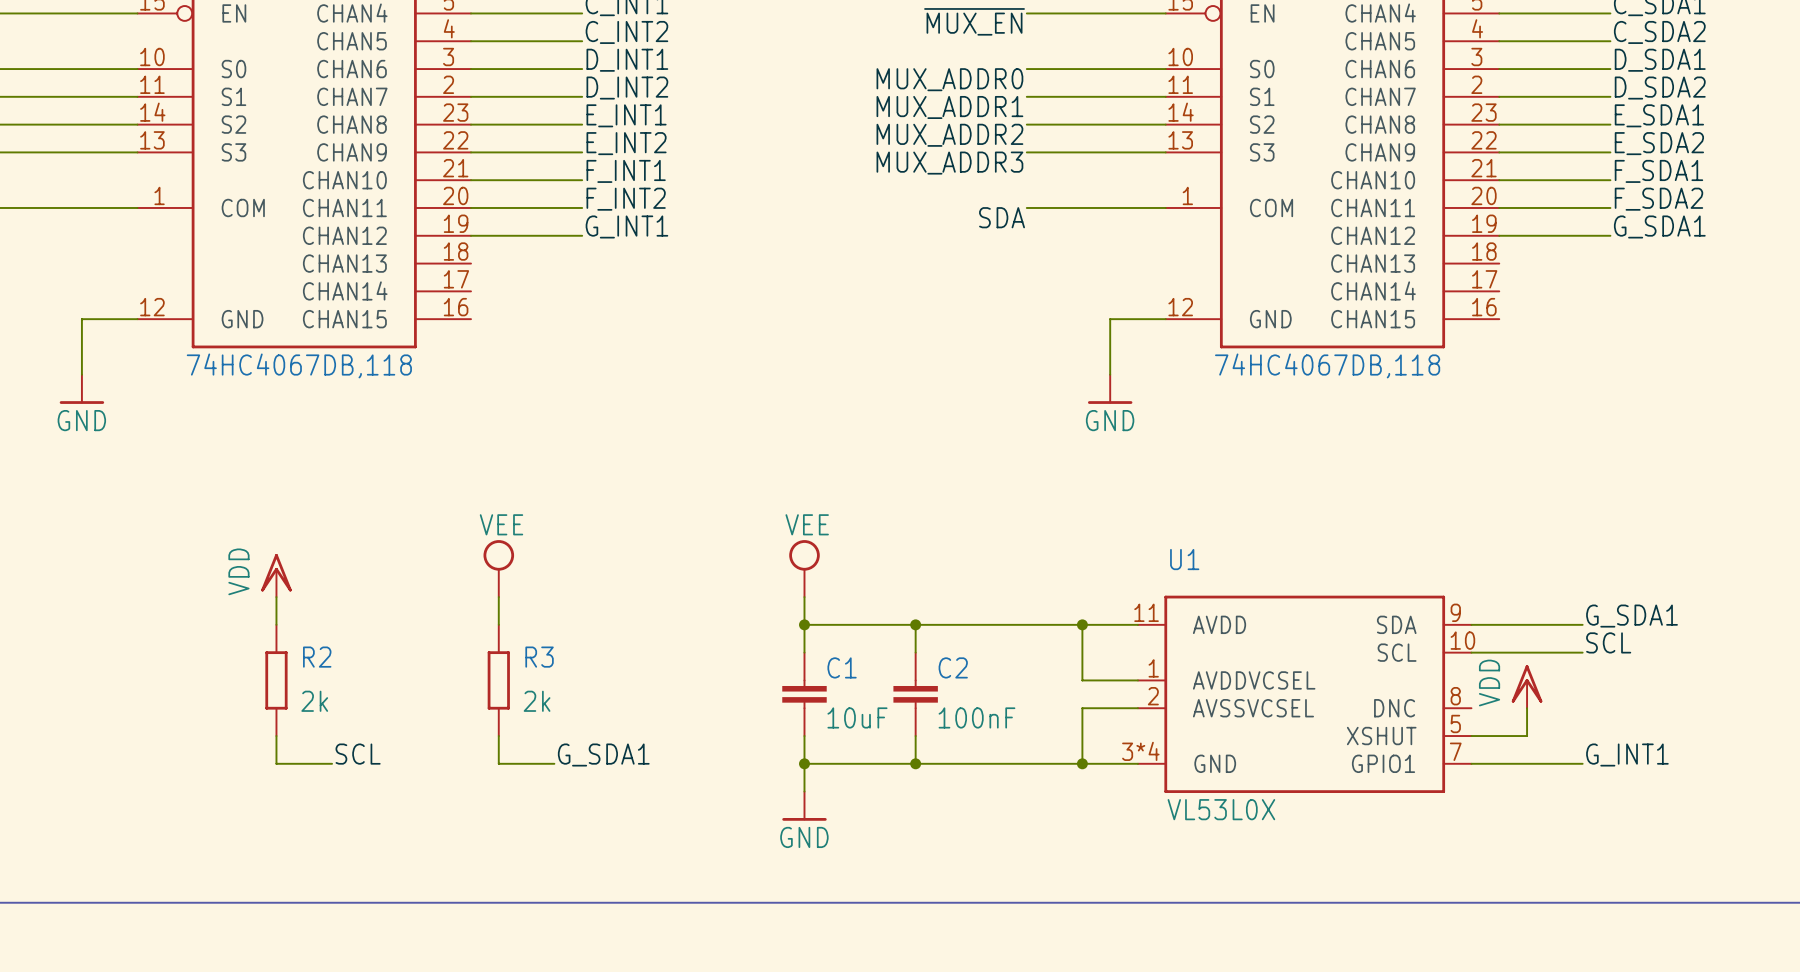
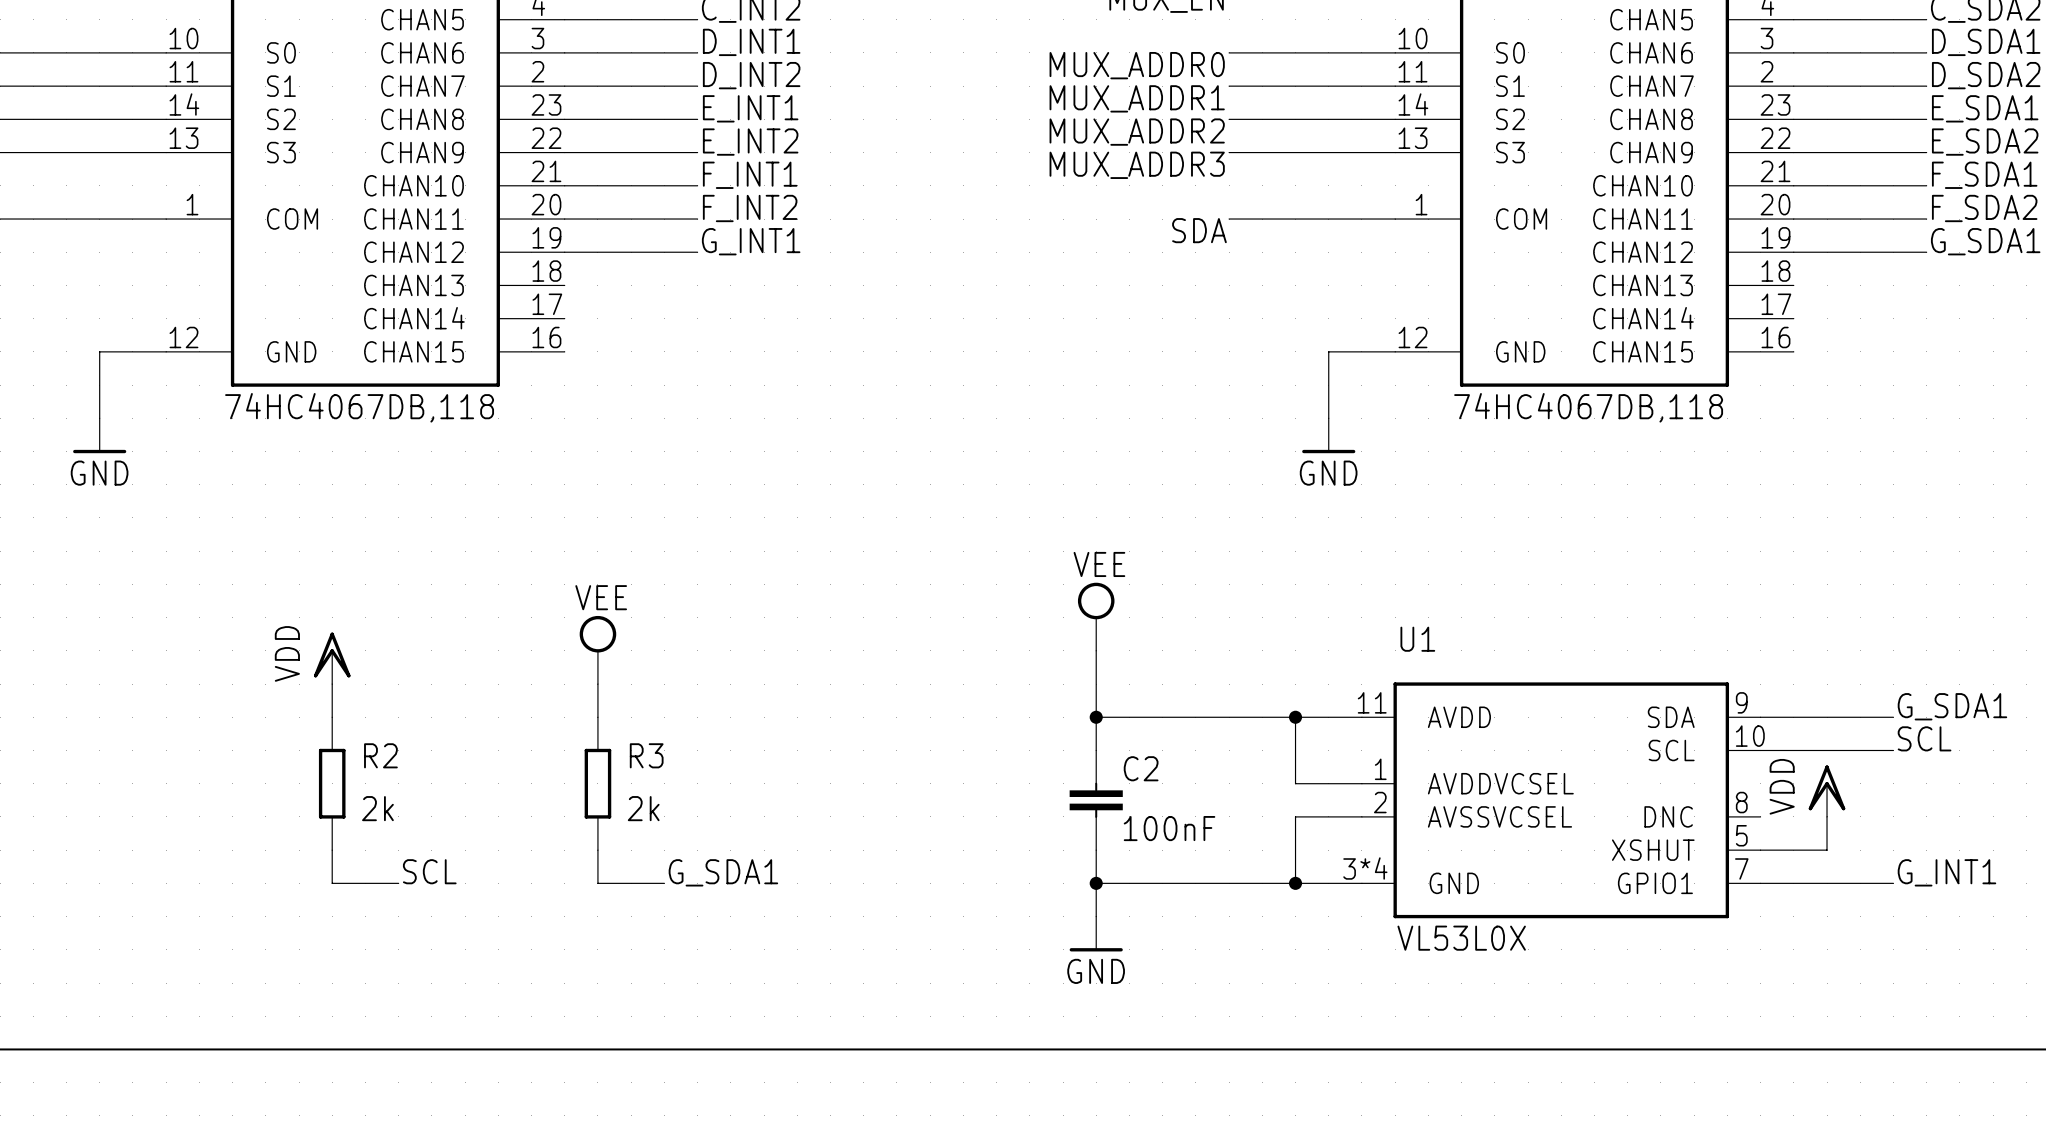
power symbol position: VEE (804, 568) -> VEE (1096, 616)
wire: (804, 597) (804, 652) -> none
wire: (804, 624) (915, 624) -> (1096, 650) (1096, 717)
junction: (804, 624) -> none
C1: 10uF (804, 694) -> none
wire: (804, 736) (804, 791) -> none
wire: (804, 763) (915, 763) -> (1096, 916) (1096, 883)
junction: (804, 763) -> none
power symbol position: GND (804, 806) -> GND (1096, 934)

